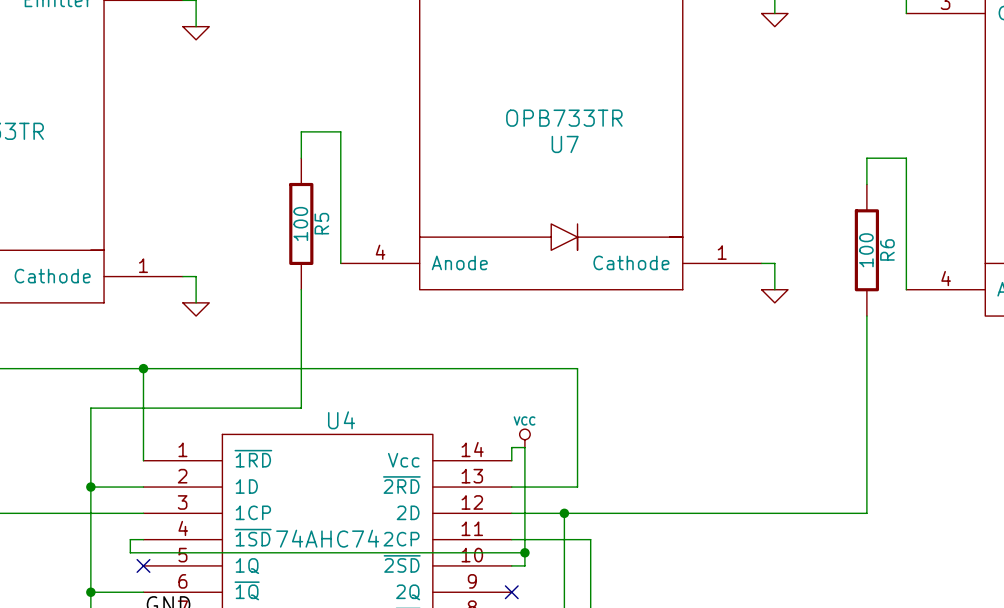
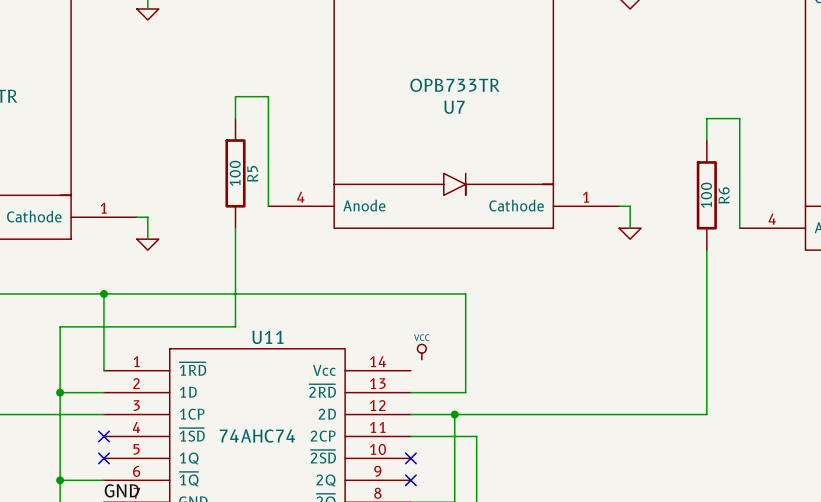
U4 name: U4 (341, 420) -> U11 (267, 337)
wire: (511, 460) (511, 447) (524, 447) (524, 565) (511, 565) -> none
wire: (143, 539) (130, 539) (130, 552) (524, 552) -> none
no-connect mark: none -> (103, 436)
junction: (524, 552) -> none
no-connect mark: none -> (410, 458)

